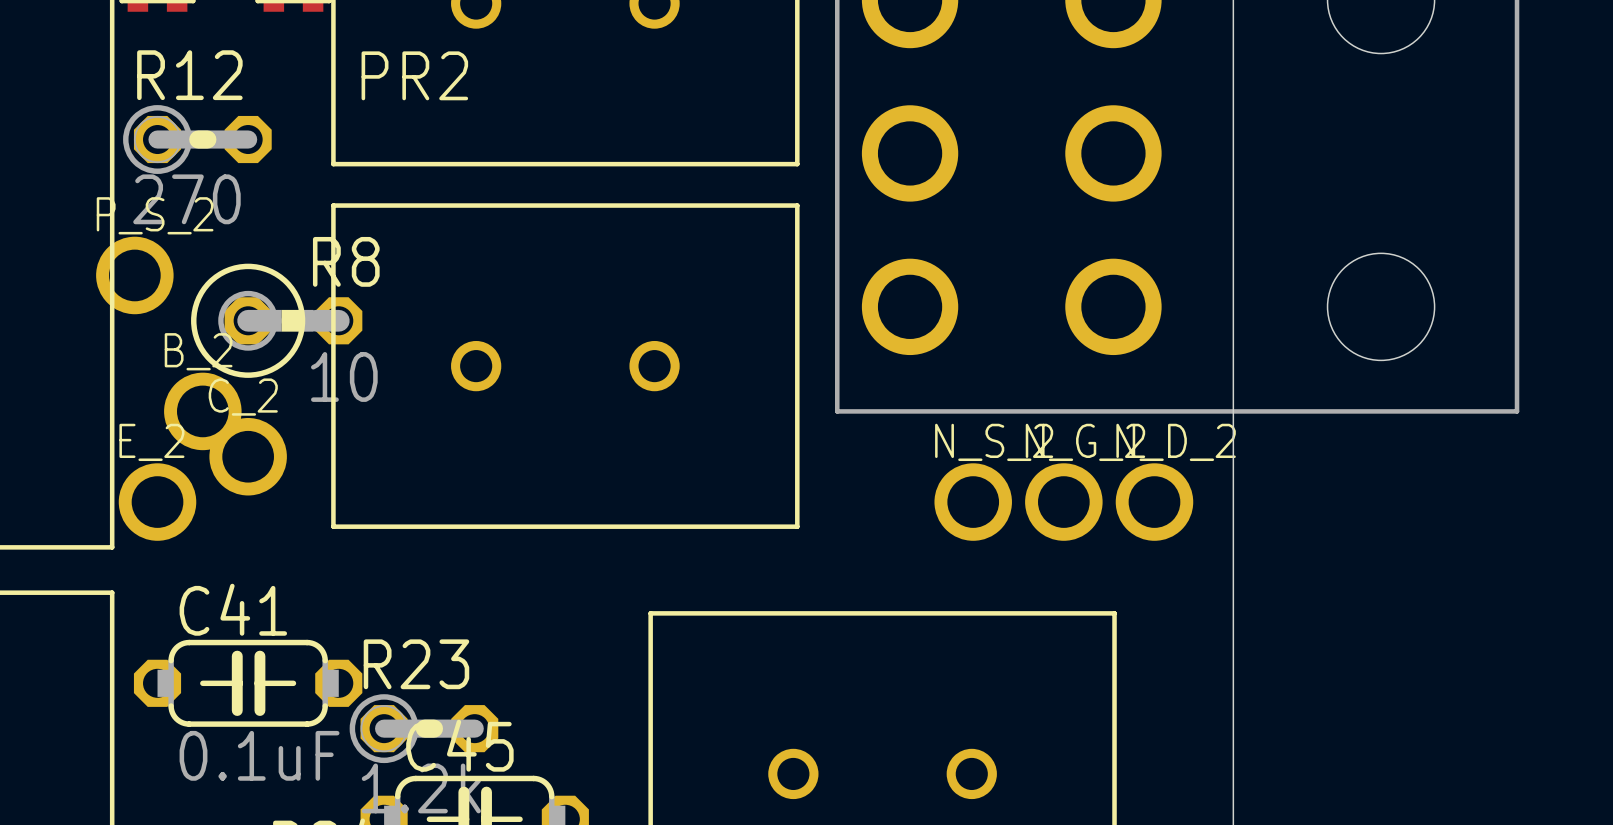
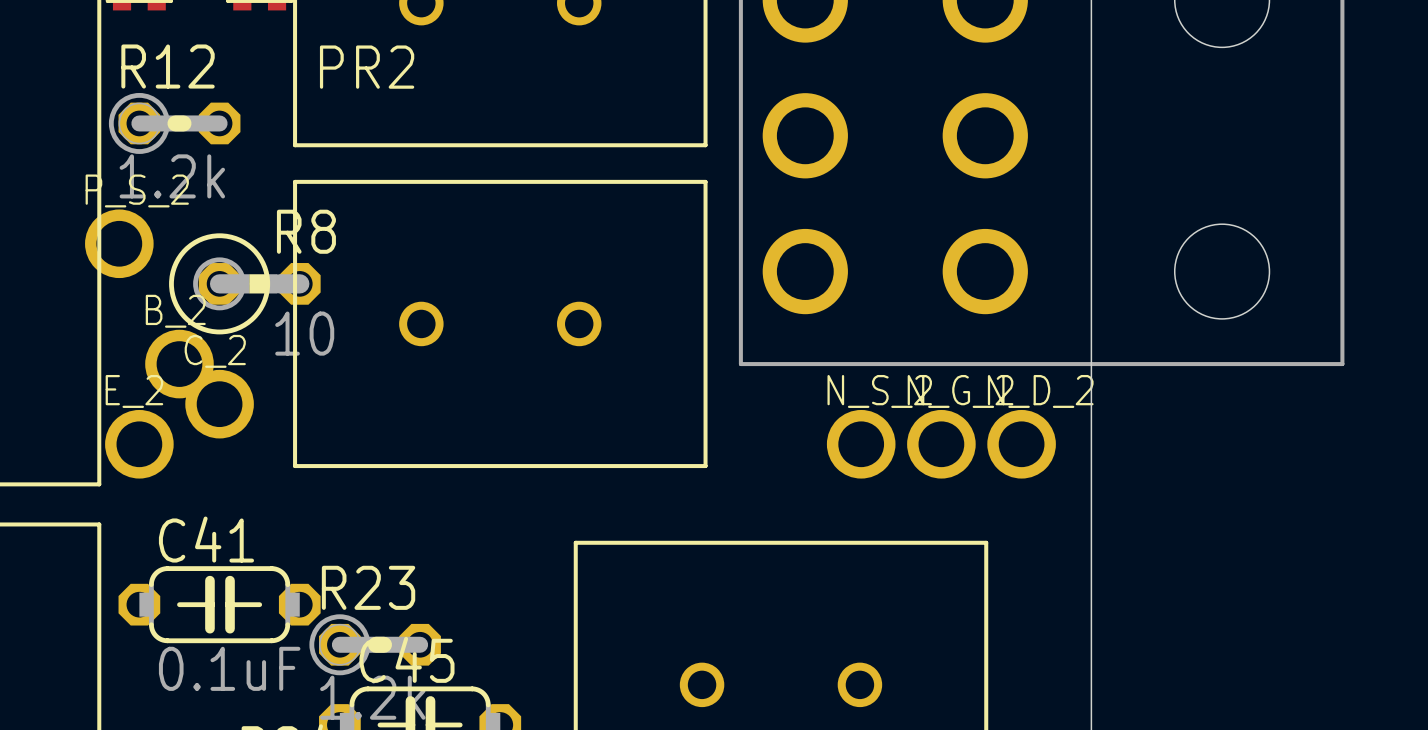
R12 value: 270 (186, 199) -> 1.2k (172, 176)

